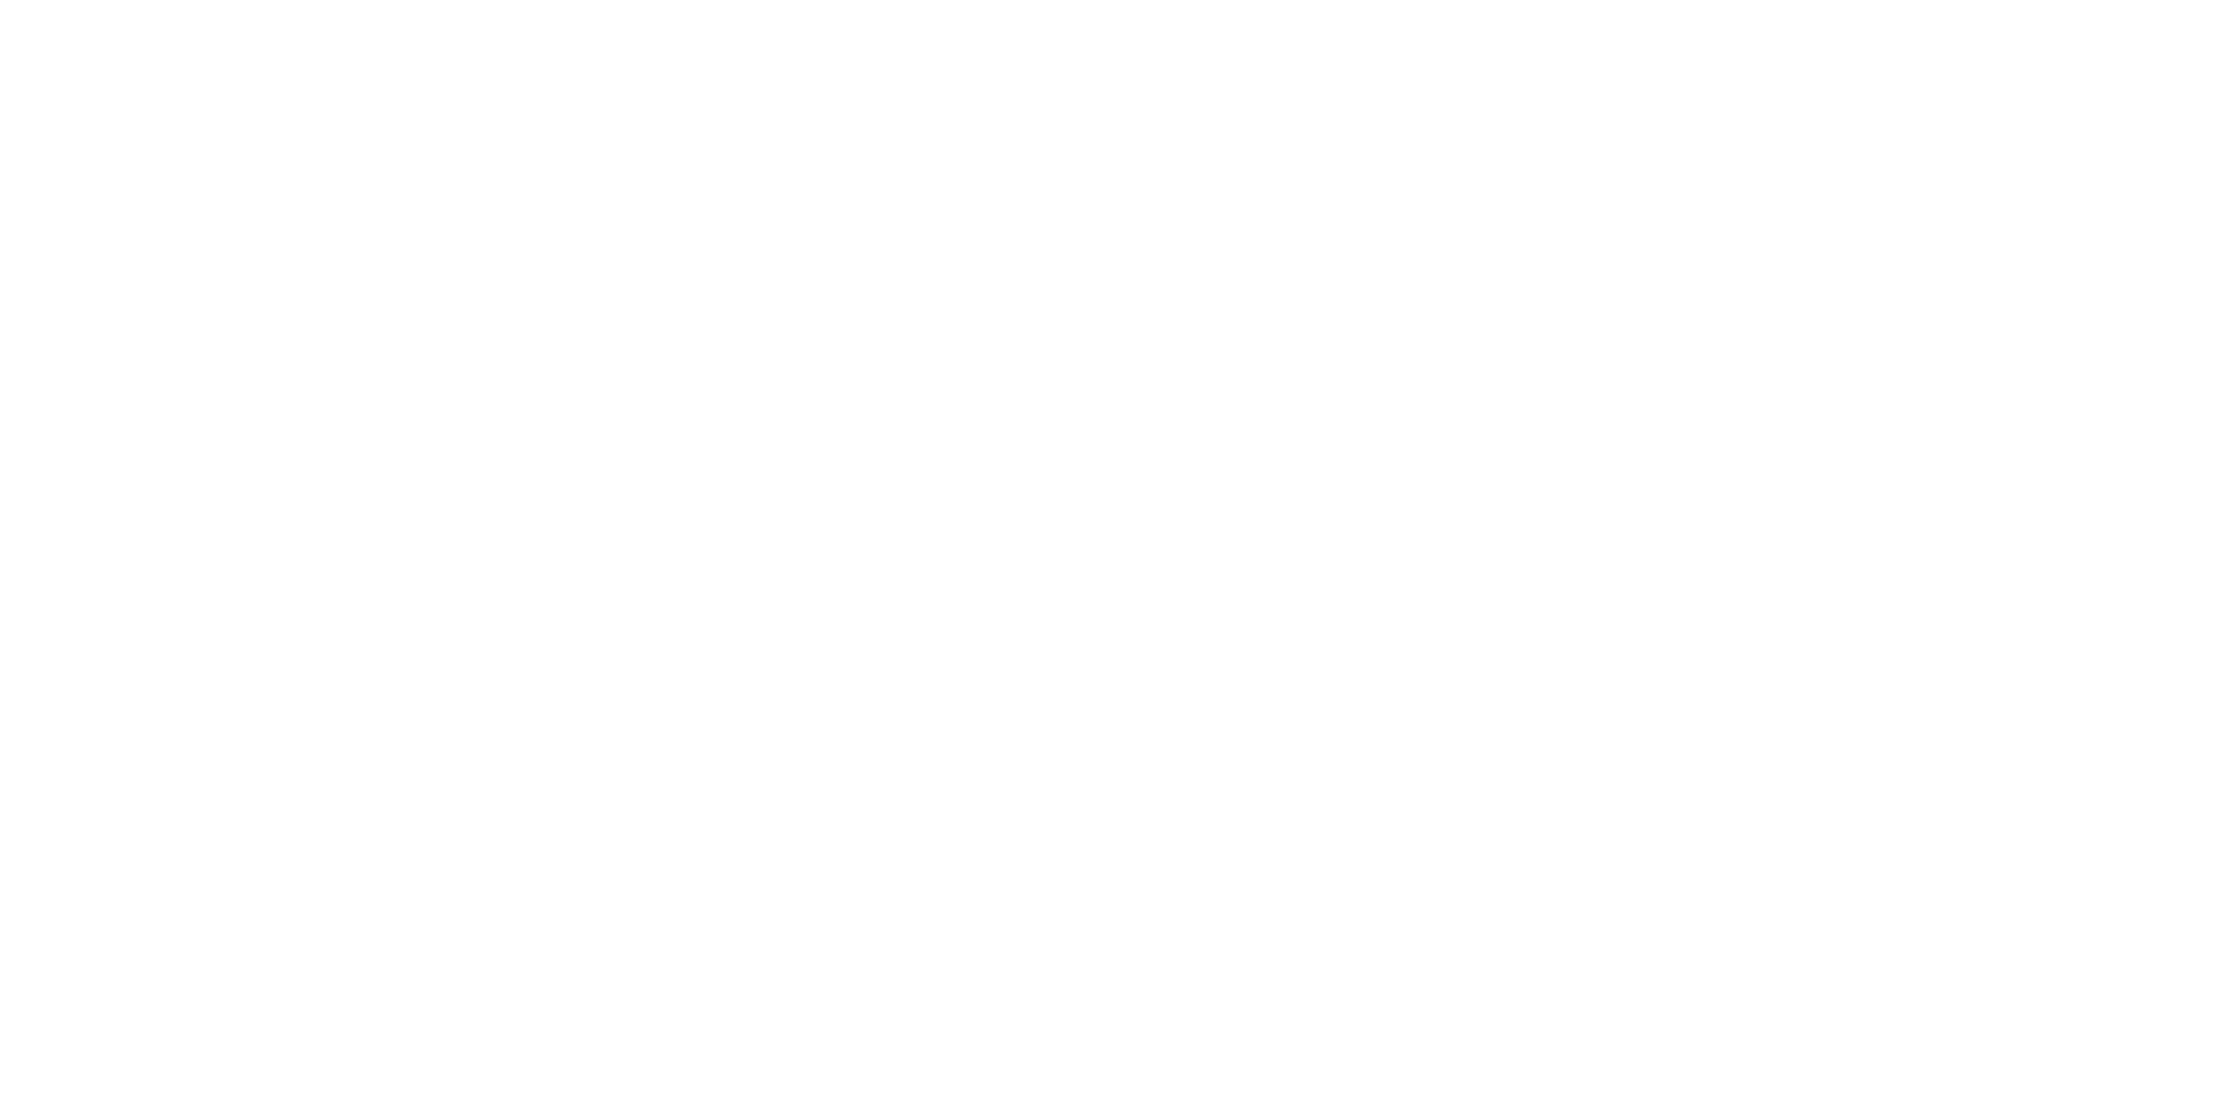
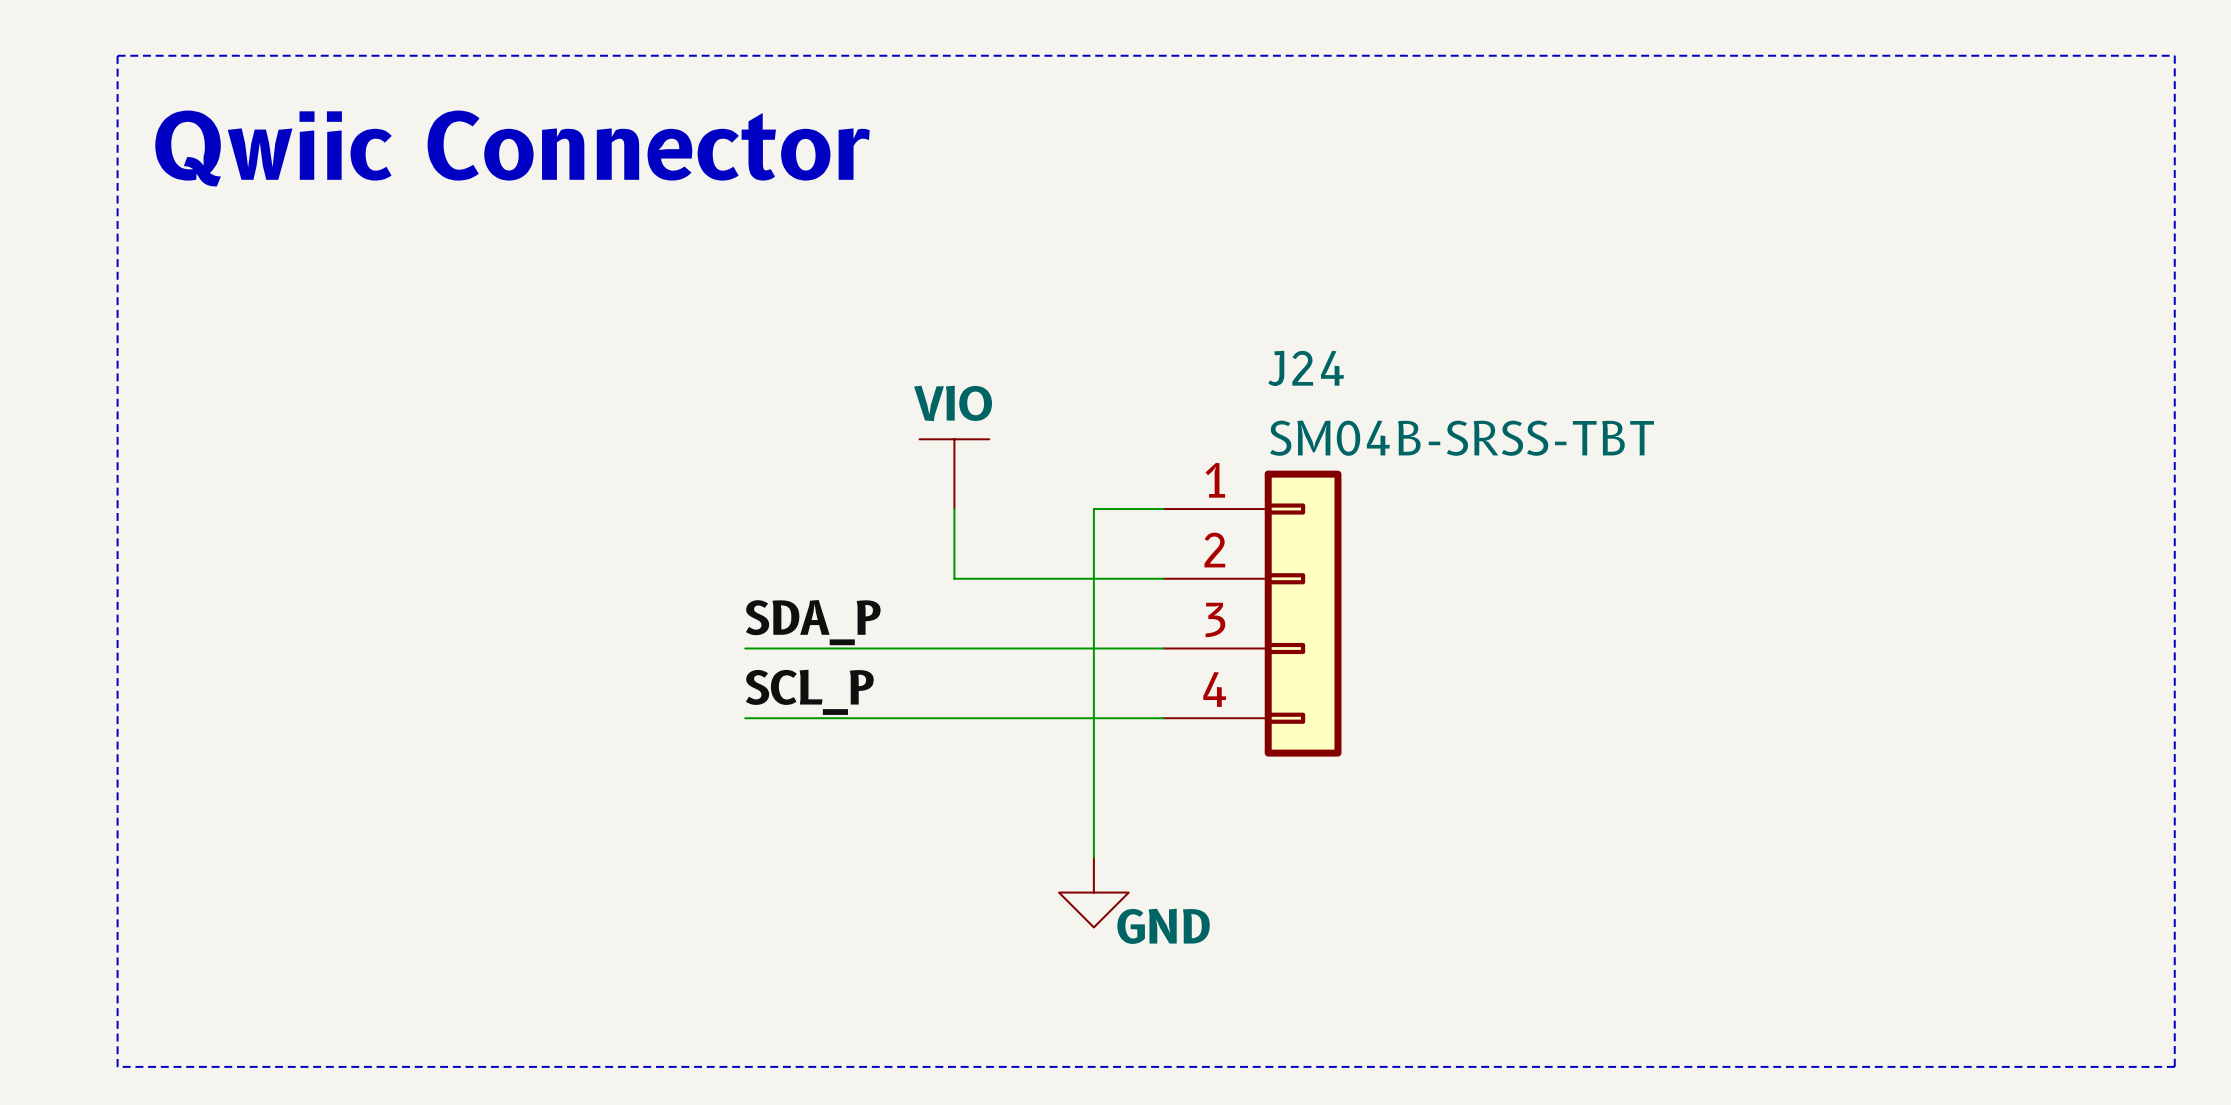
line: none -> (117, 55) (2174, 55) (2174, 1066) (117, 1066) (117, 55)
text: none -> Qwiic Connector (512, 148)
power symbol: none -> VIO (954, 474)
wire: none -> (954, 509) (954, 578) (1163, 578)
wire: none -> (1163, 509) (1093, 509) (1093, 857)
J24: none -> SM04B-SRSS-TBT (1252, 613)
label: none -> SDA_P (813, 622)
wire: none -> (745, 648) (1163, 648)
label: none -> SCL_P (809, 692)
wire: none -> (745, 718) (1163, 718)
power symbol: none -> GND (1093, 892)

